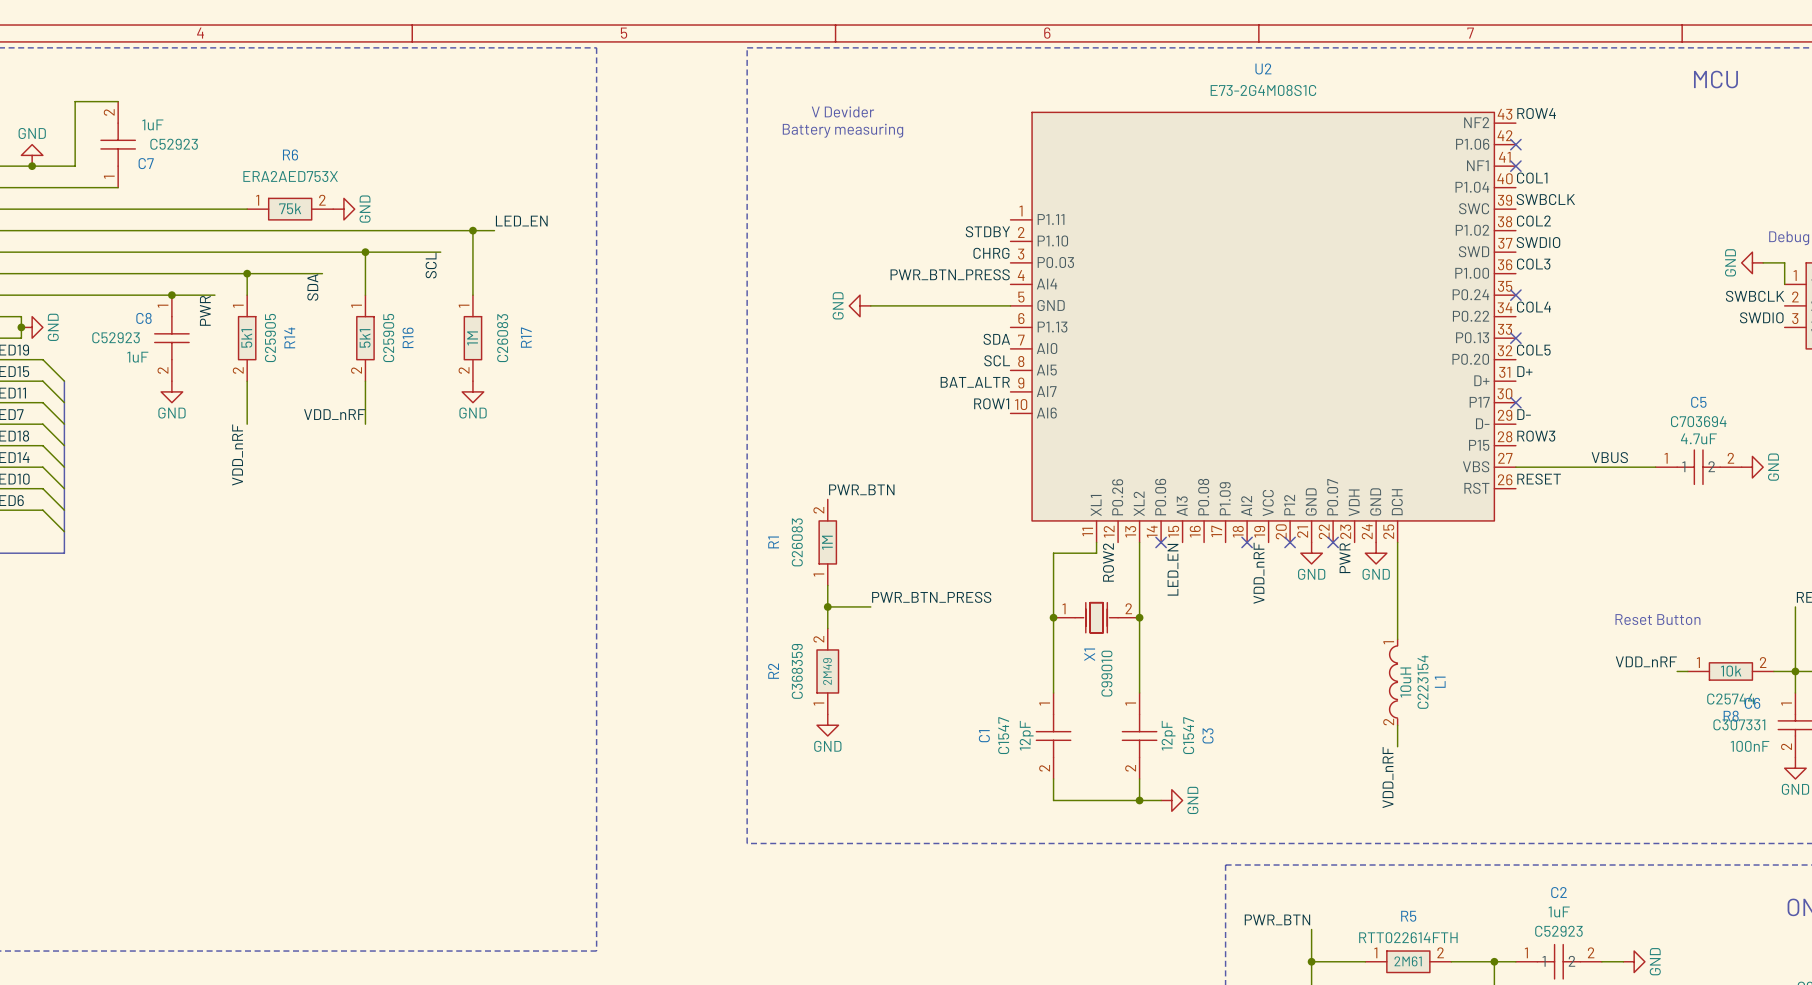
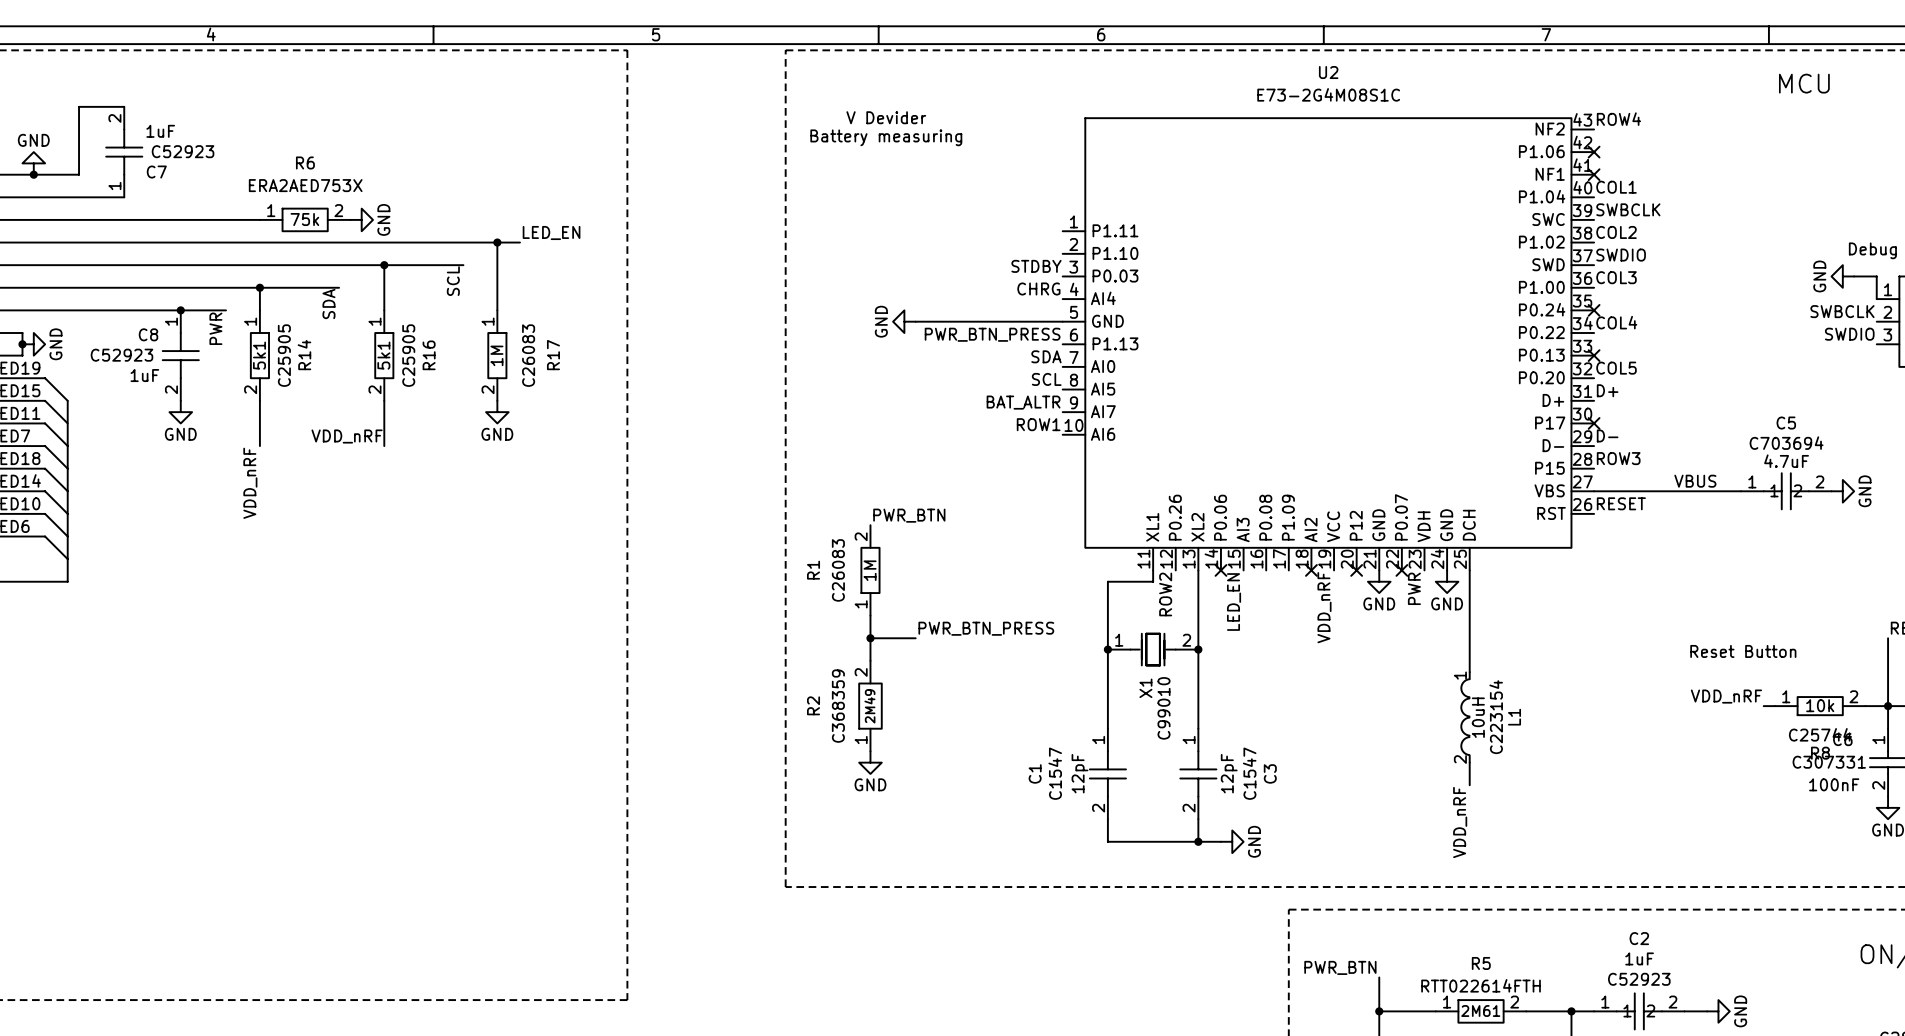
label: STDBY (987, 231) -> none
label: CHRG (991, 253) -> STDBY (1036, 266)
label: PWR_BTN_PRESS (950, 274) -> CHRG (1038, 288)
label: none -> PWR_BTN_PRESS (992, 334)

